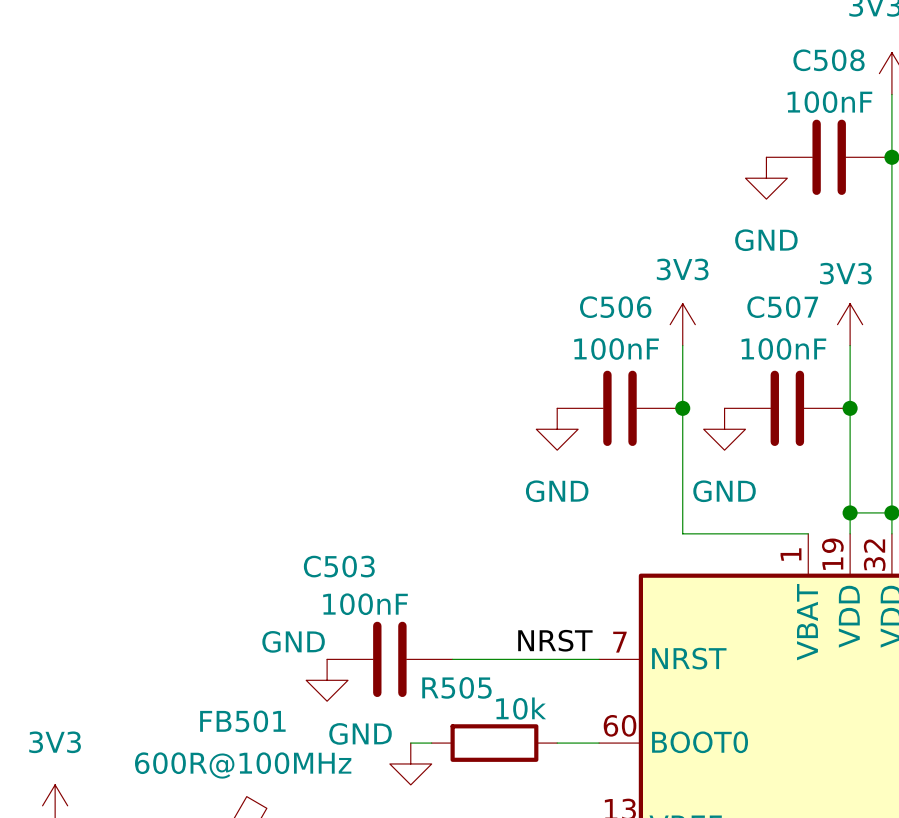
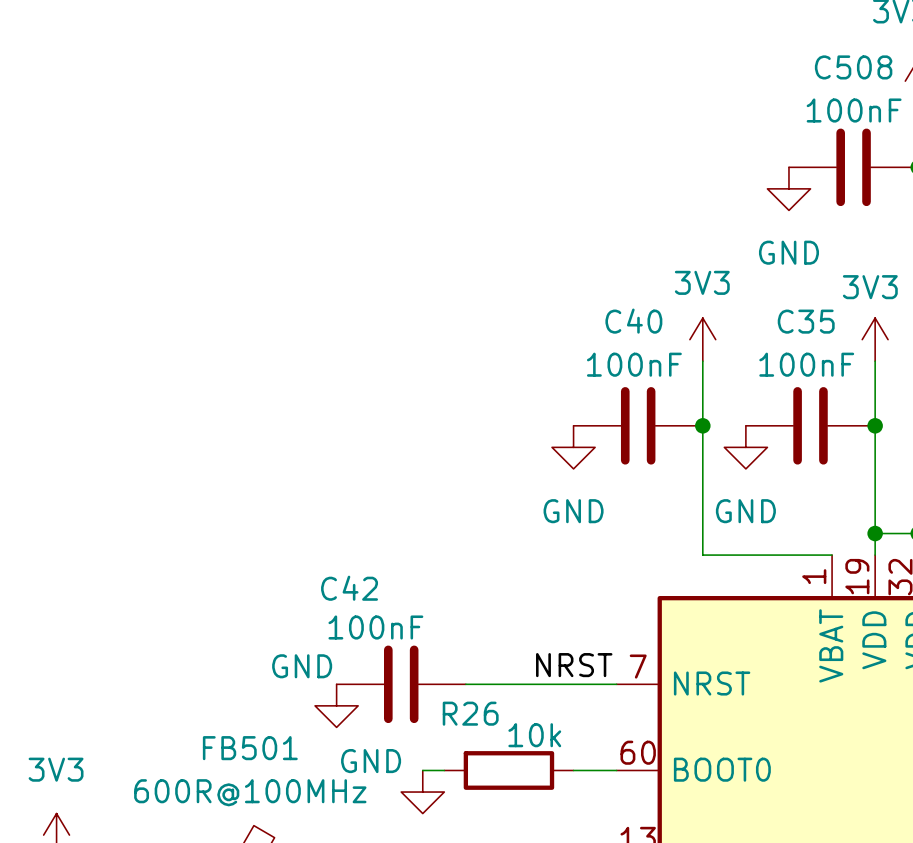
C506 name: C506 (615, 307) -> C40 (633, 321)
C507 name: C507 (782, 307) -> C35 (806, 321)
C503 name: C503 (339, 566) -> C42 (349, 588)
R505 name: R505 (456, 687) -> R26 (470, 713)

